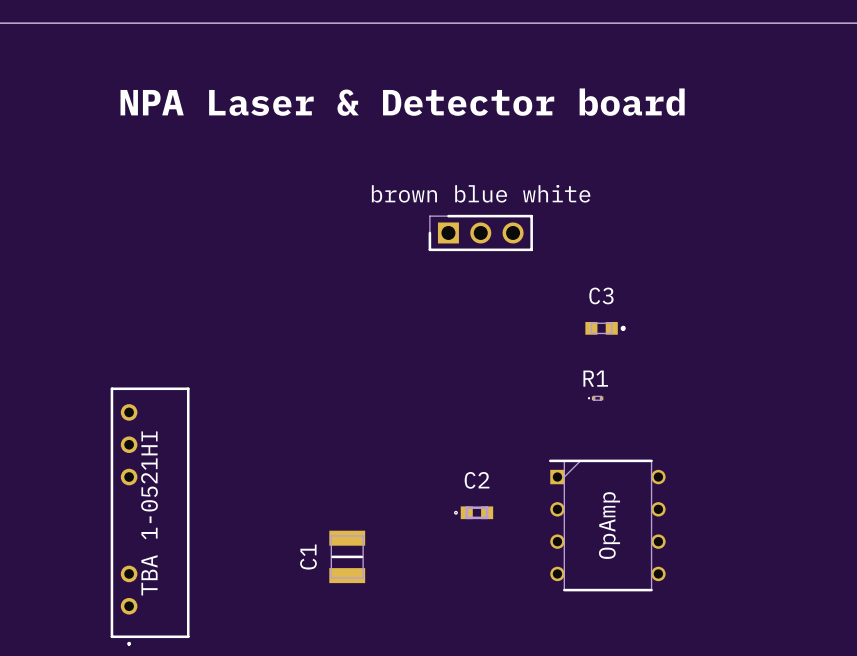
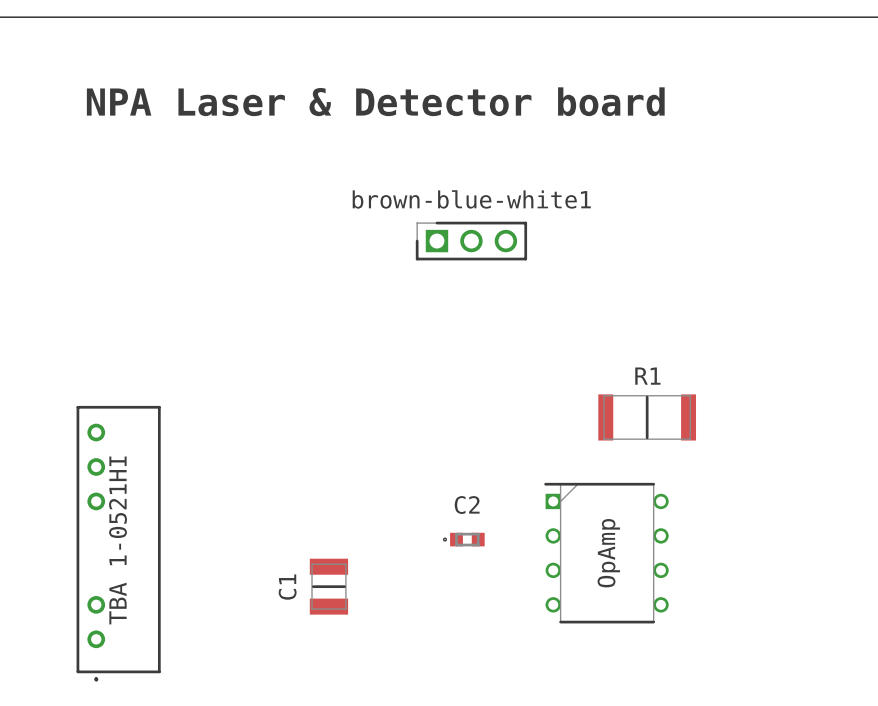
brown blue white name: brown blue white (481, 193) -> brown-blue-white1 (471, 199)
C3: (605, 328) -> none
R1 footprint: [588, 395, 604, 401] -> [598, 394, 697, 441]

